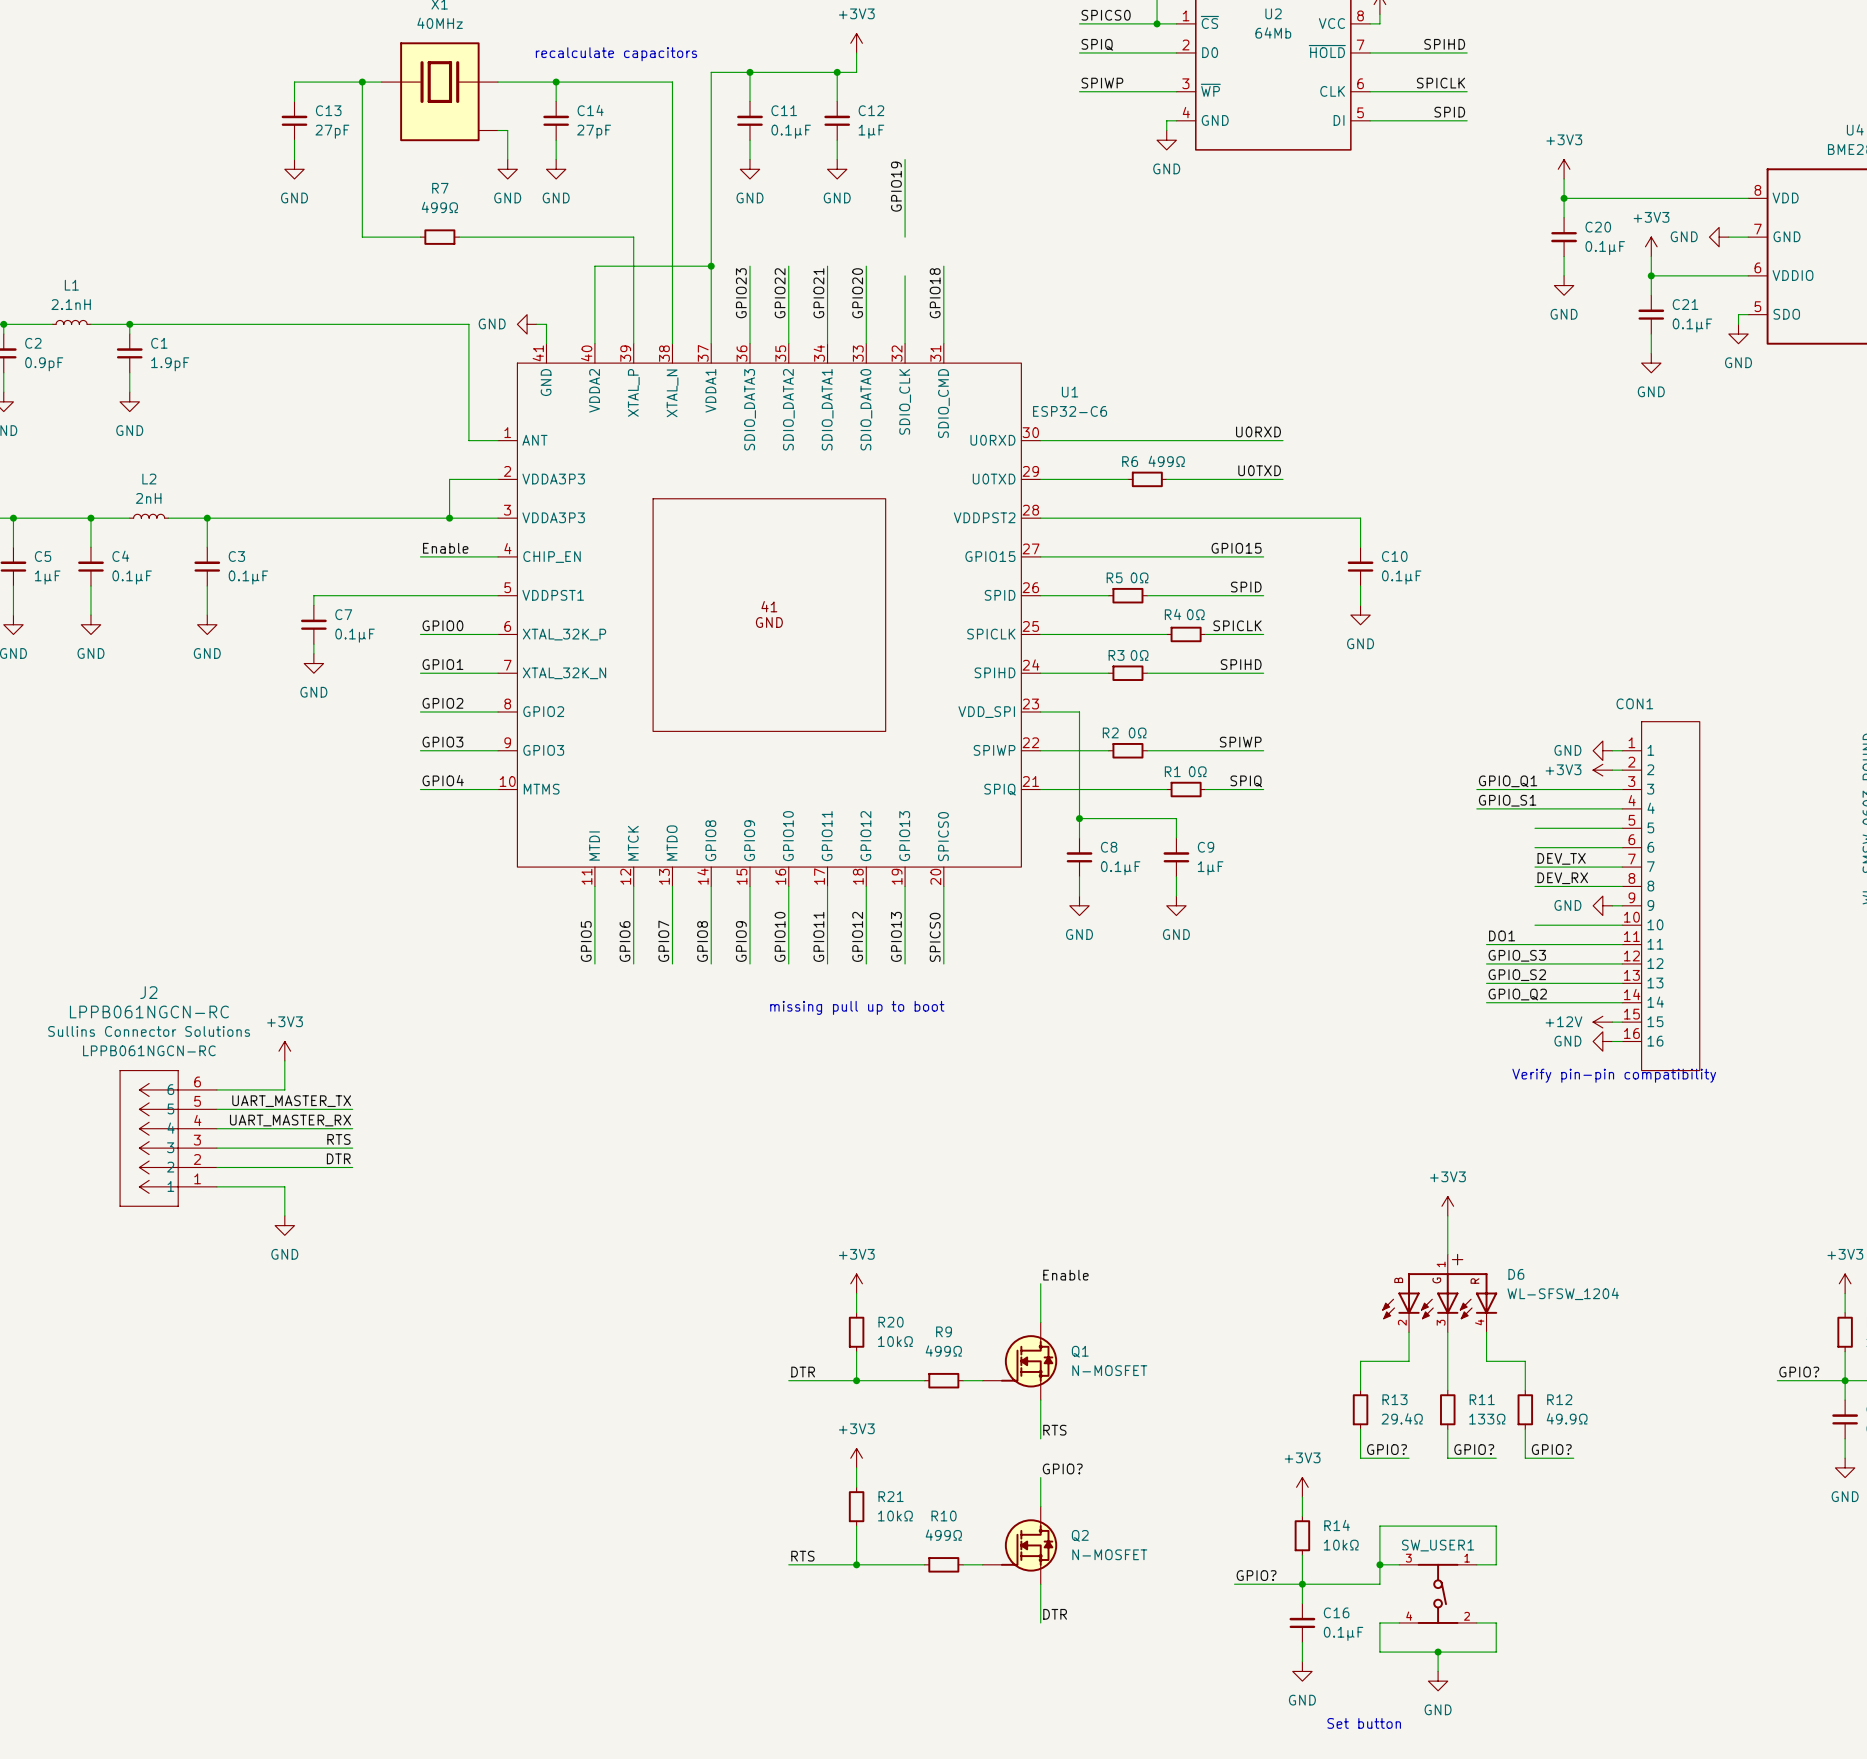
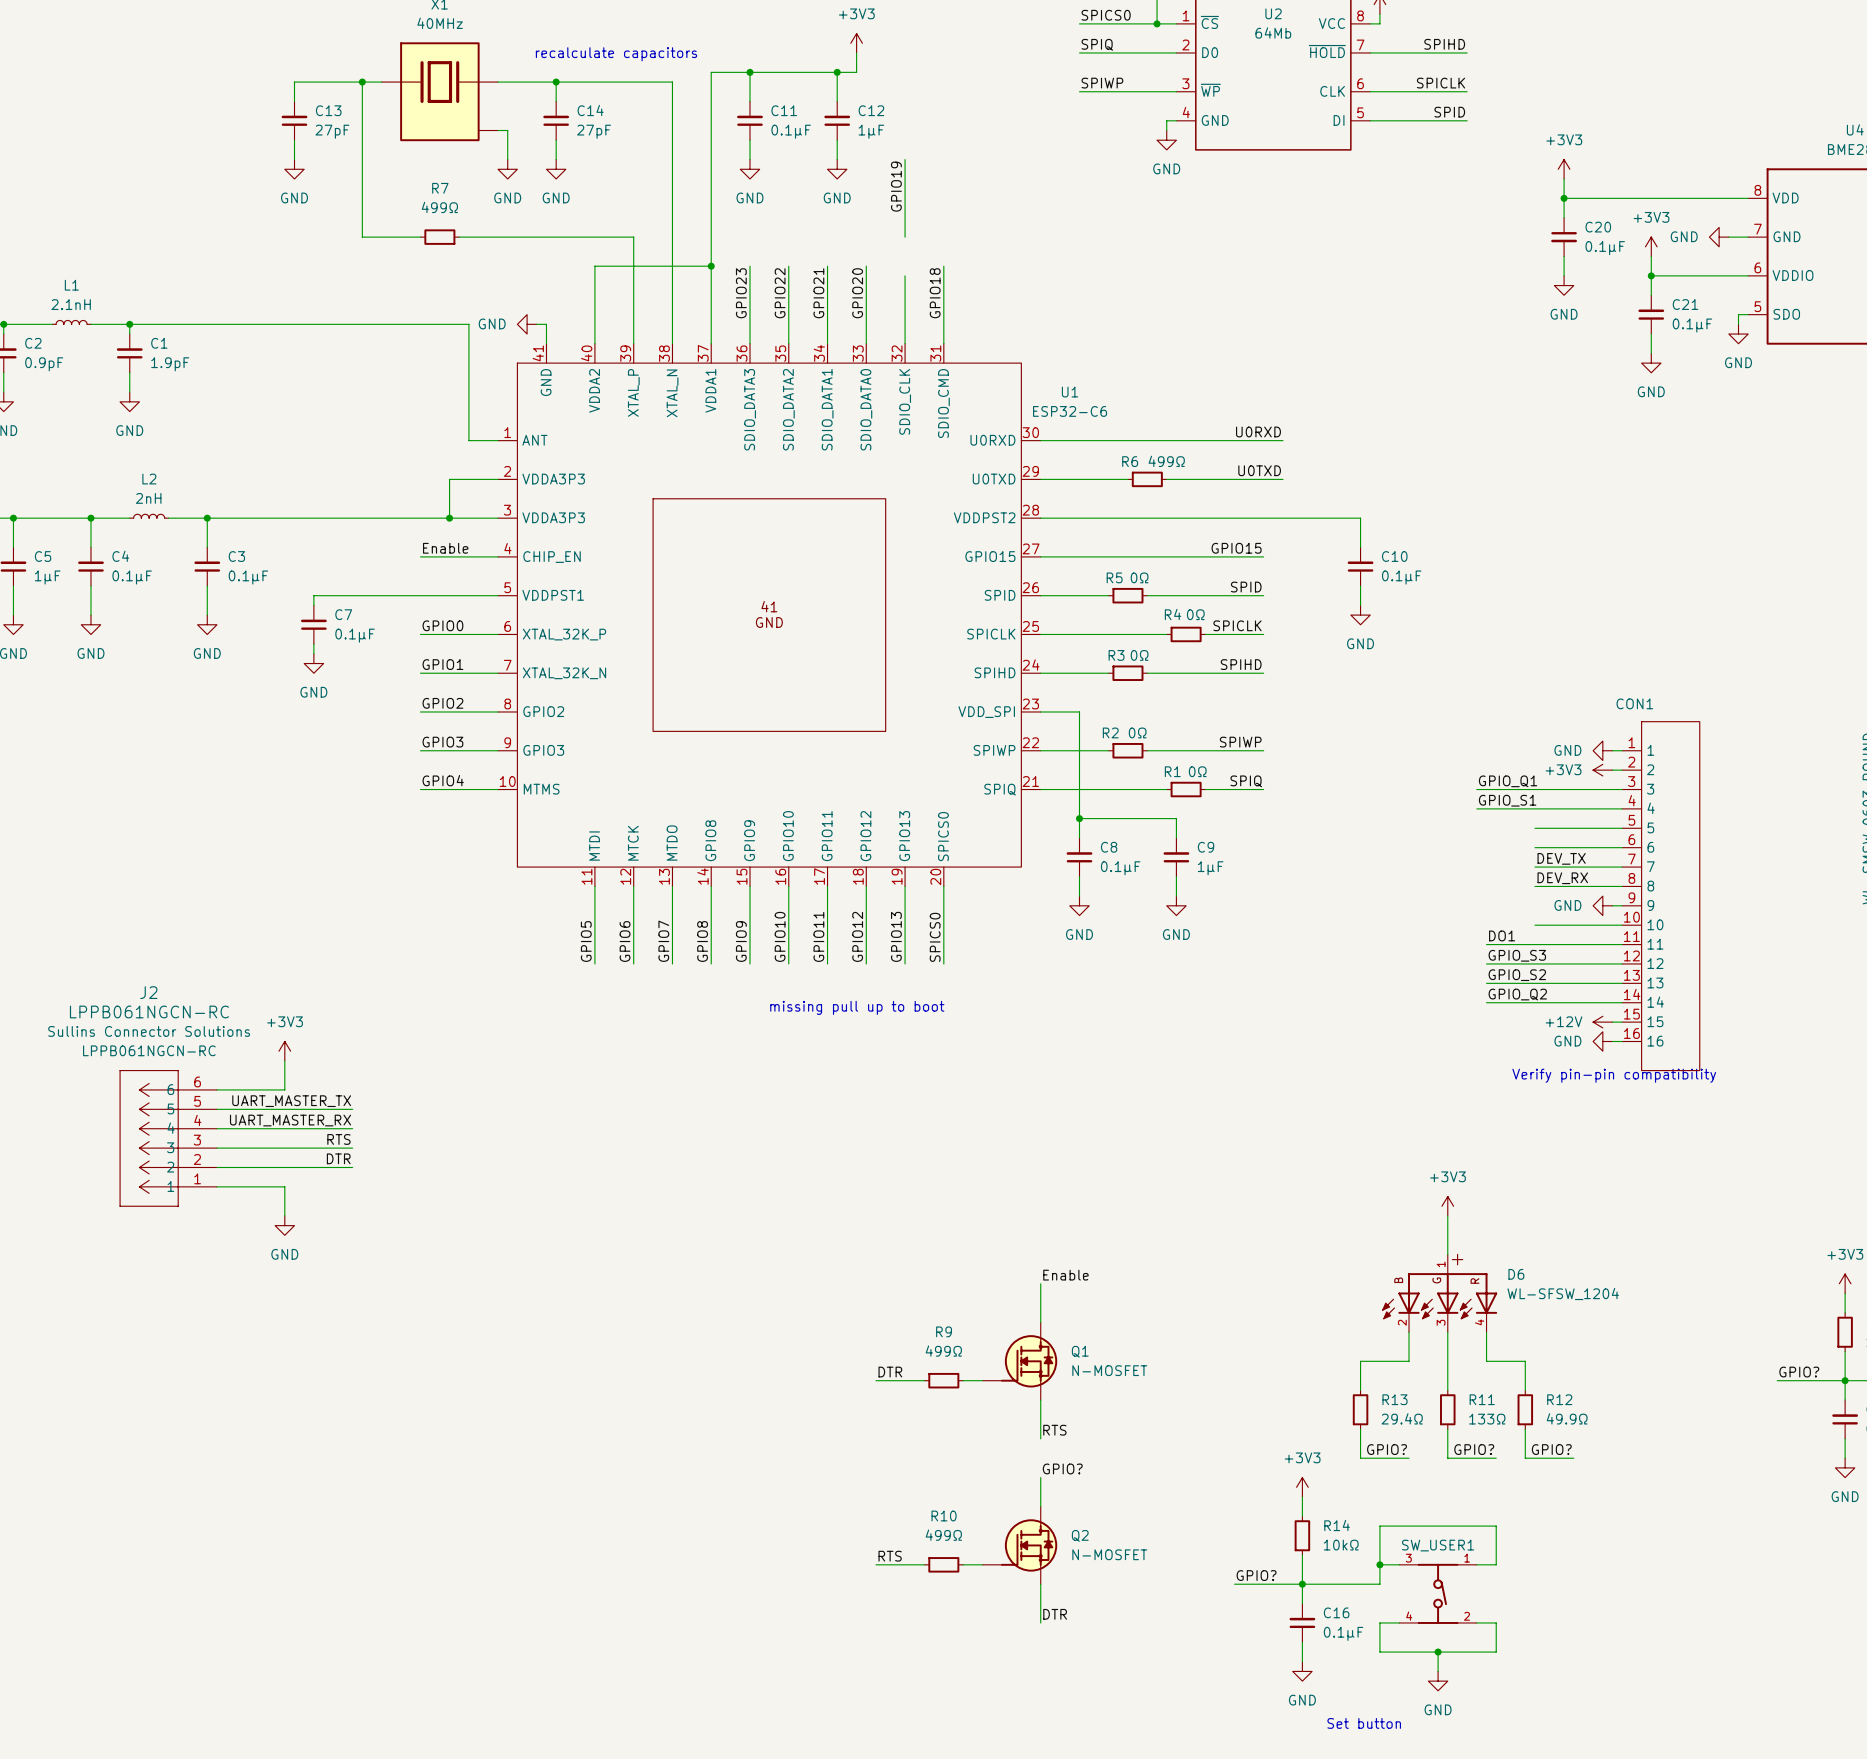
power symbol: +3V3 (856, 1283) -> none
wire: (856, 1293) (856, 1312) -> none
R20: (856, 1332) -> none
wire: (856, 1351) (856, 1380) -> none
label position: DTR (803, 1372) -> DTR (890, 1372)
wire: (788, 1380) (875, 1380) -> none
junction: (856, 1380) -> none
power symbol: +3V3 (856, 1458) -> none
wire: (856, 1467) (856, 1487) -> none
R21: (856, 1506) -> none
wire: (856, 1526) (856, 1564) -> none
label position: RTS (802, 1556) -> RTS (890, 1556)
wire: (788, 1564) (875, 1564) -> none
junction: (856, 1564) -> none

